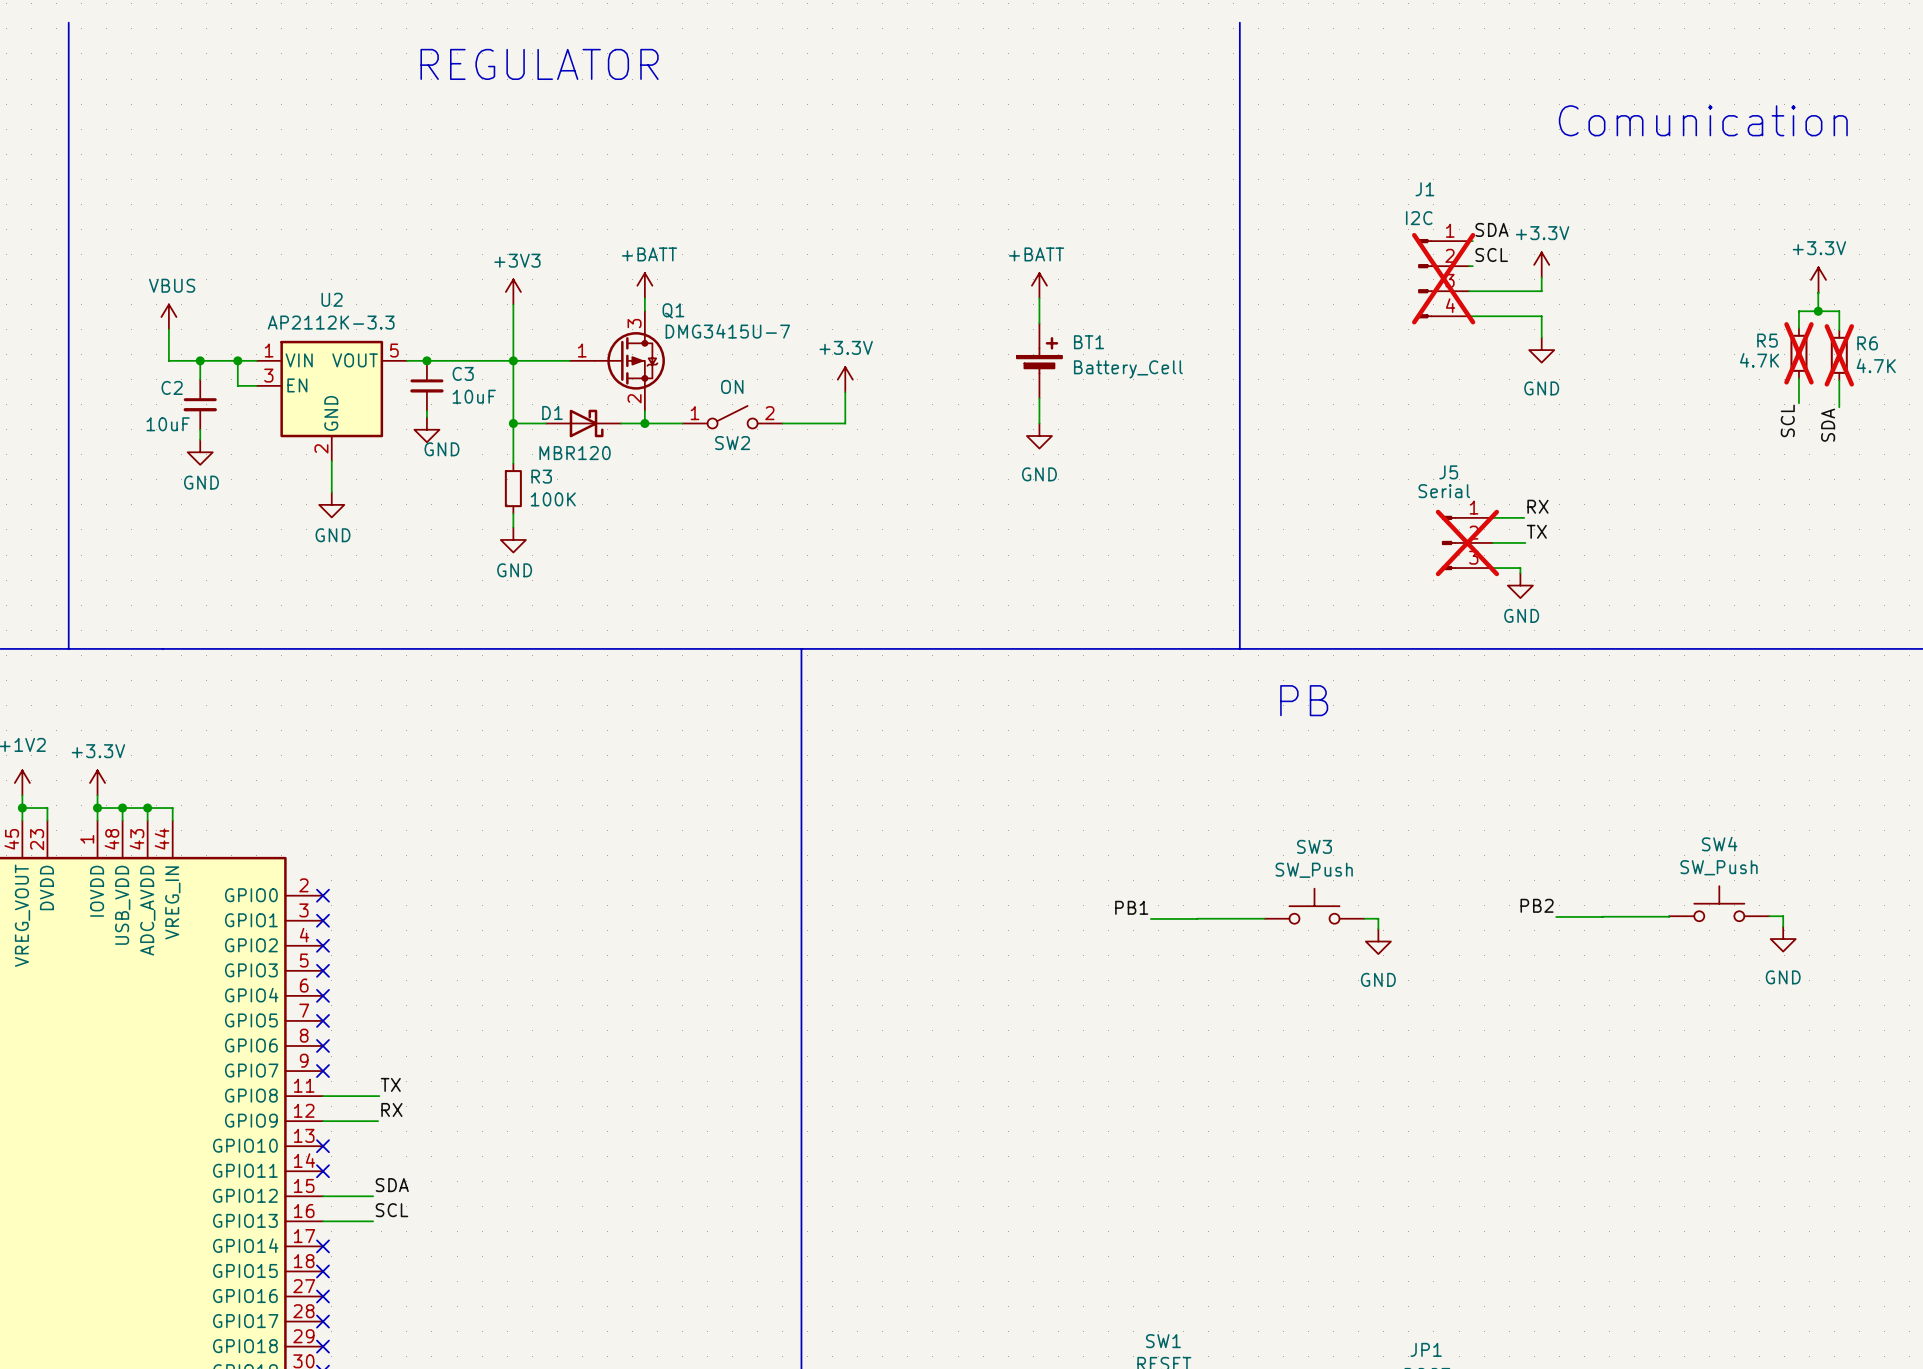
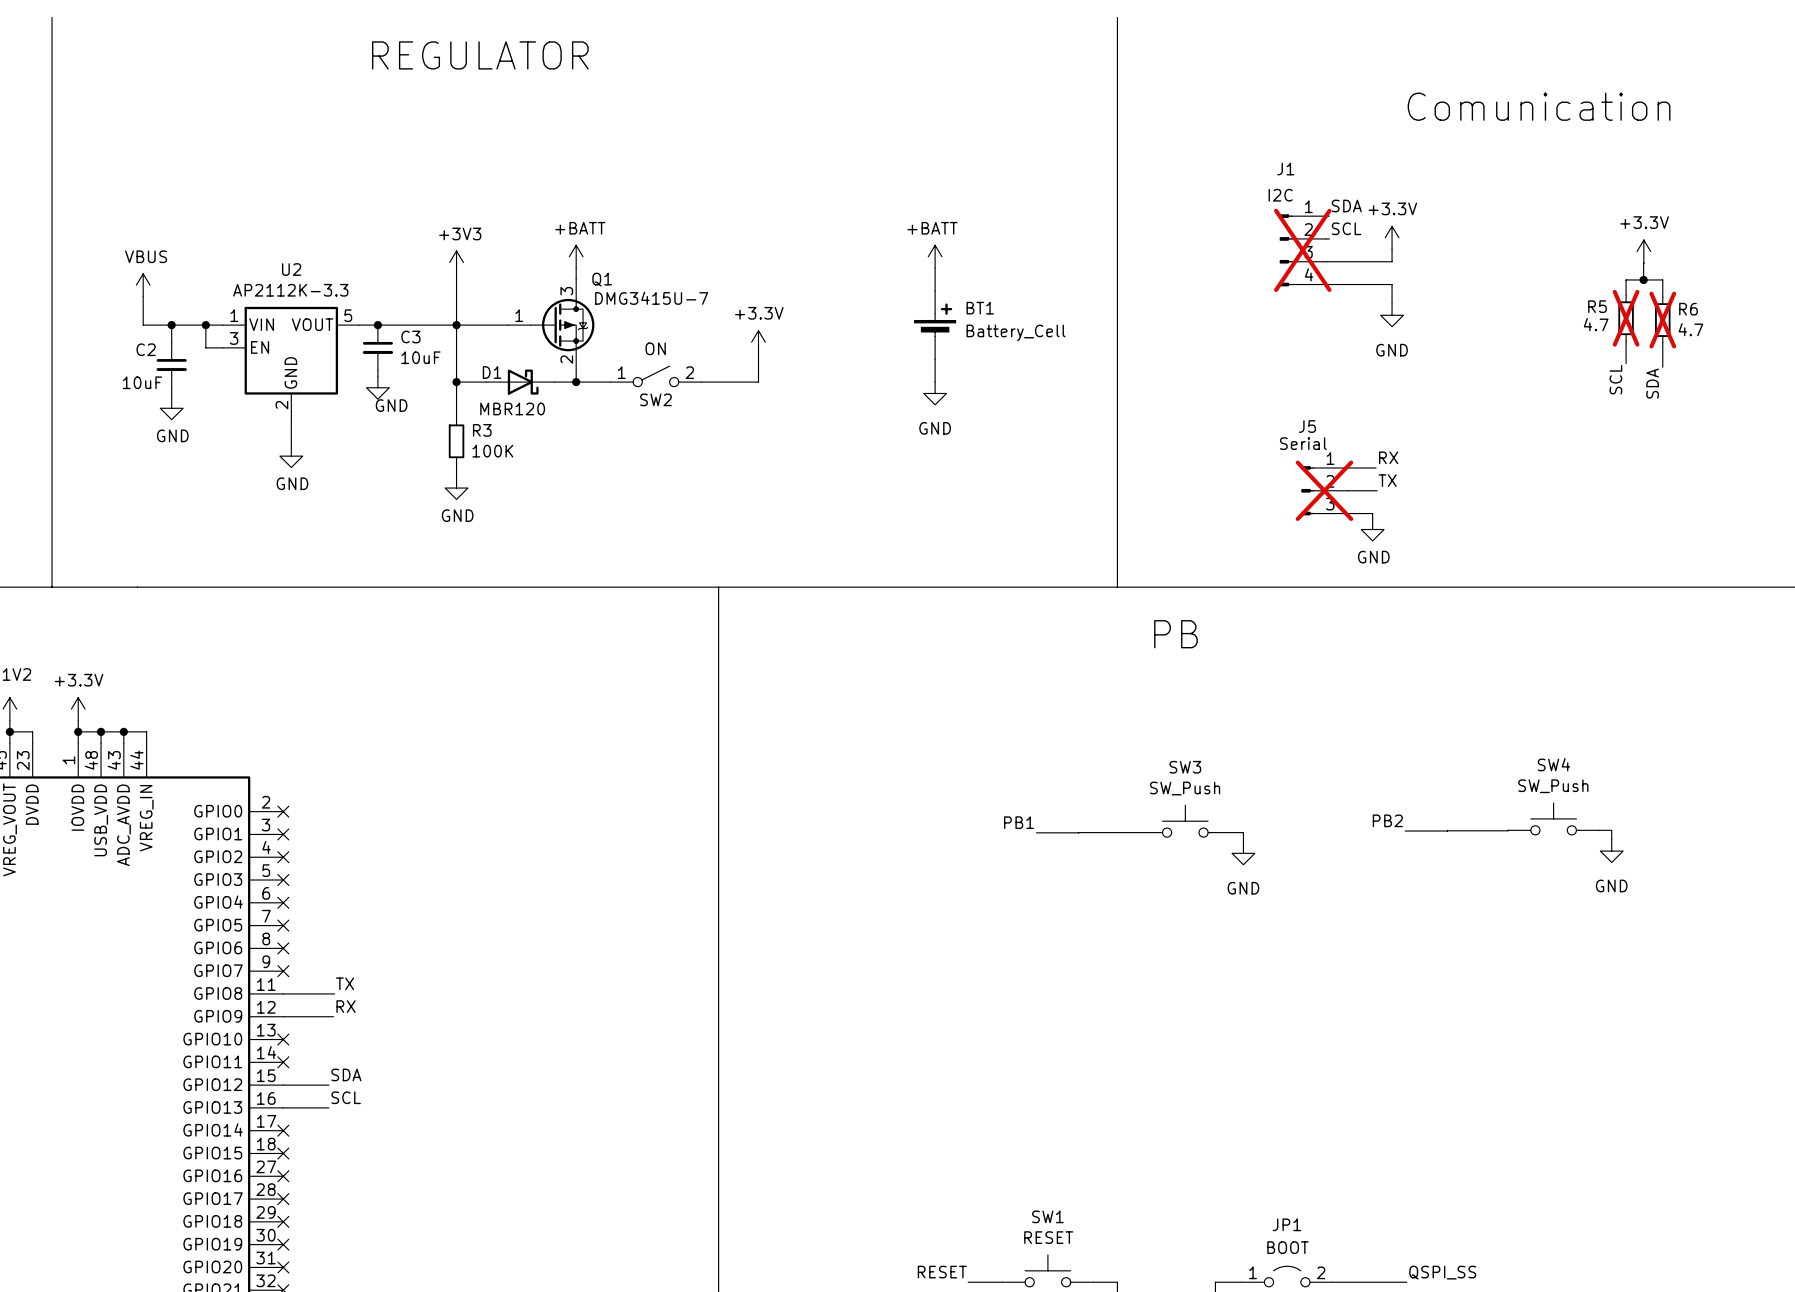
R5 value: 4.7K (1759, 360) -> 4.7 (1596, 324)
R6 value: 4.7K (1876, 365) -> 4.7 (1690, 329)

